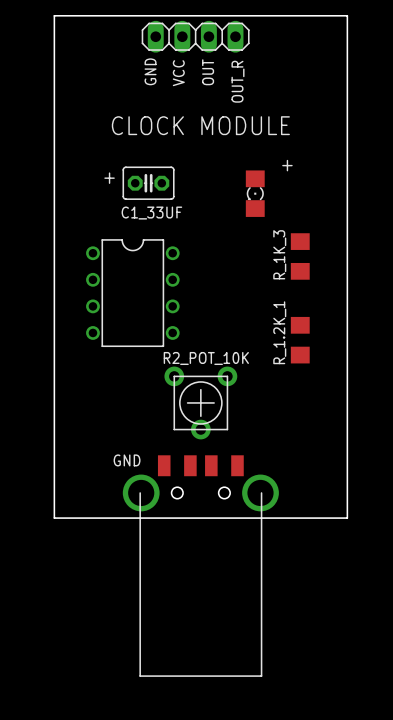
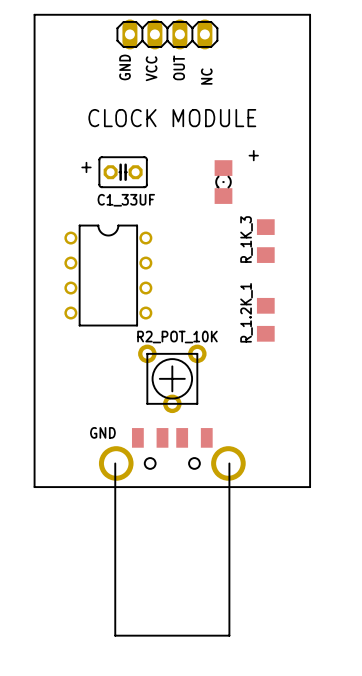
text: OUT_R (237, 81) -> NC (206, 76)

